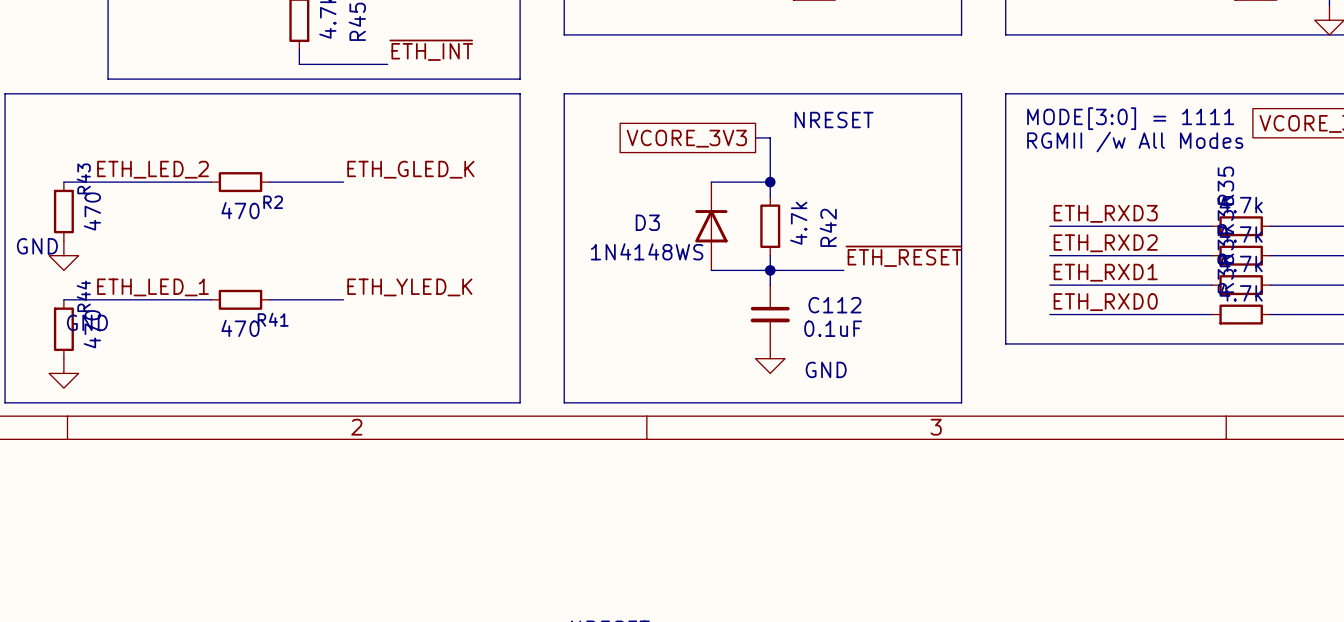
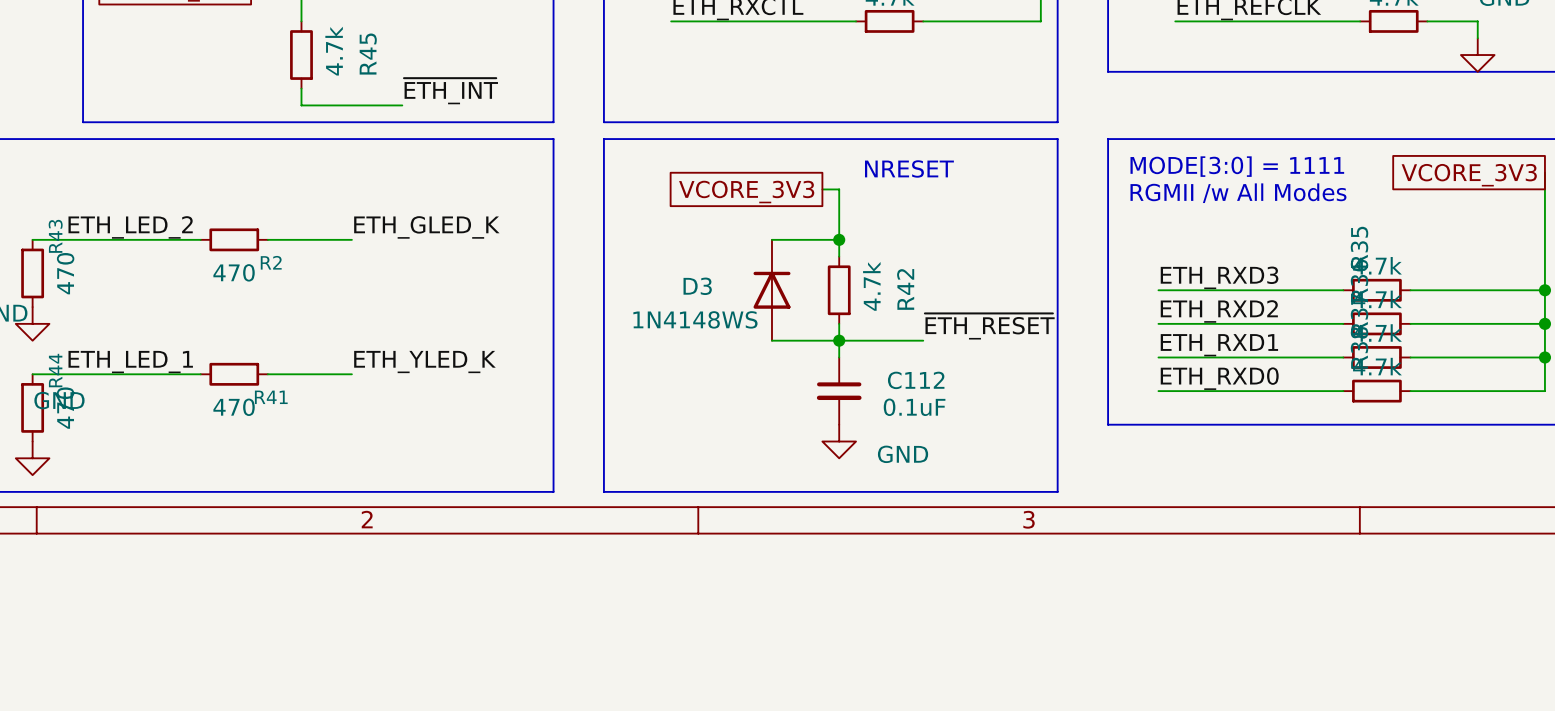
line: (564, 34) (961, 34) -> (603, 71) (603, 122) (1057, 122) (1057, 71)

